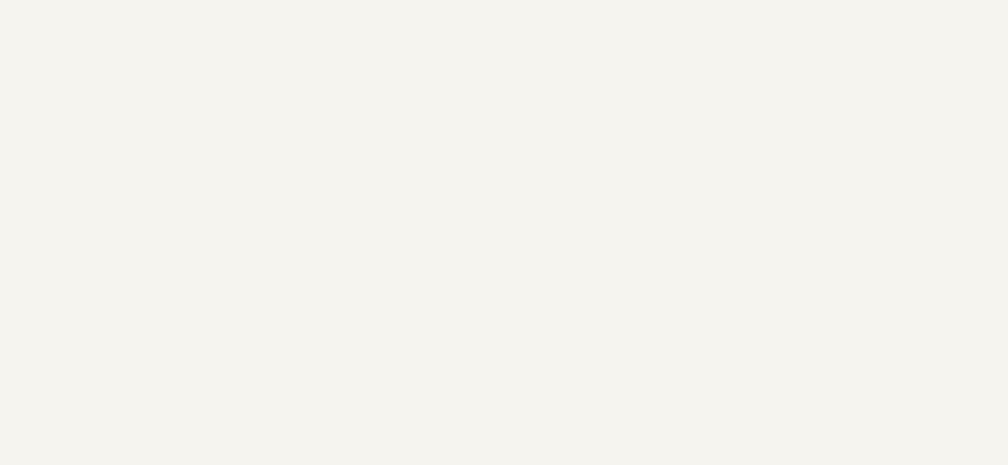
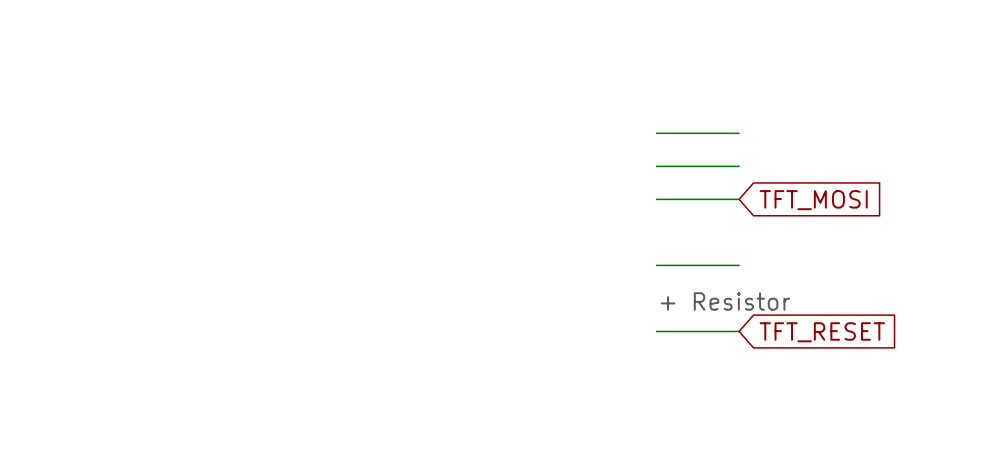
wire: none -> (656, 133) (739, 133)
wire: none -> (656, 166) (739, 166)
wire: none -> (656, 199) (739, 199)
global label: none -> TFT_MOSI (813, 200)
wire: none -> (656, 265) (739, 265)
text: none -> + Resistor (725, 301)
wire: none -> (656, 331) (739, 331)
global label: none -> TFT_RESET (822, 332)

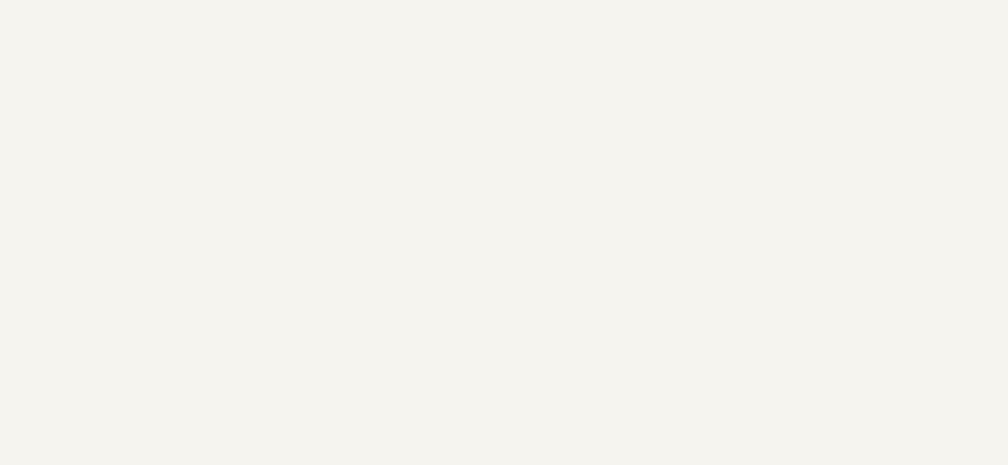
wire: (656, 133) (739, 133) -> none
wire: (656, 166) (739, 166) -> none
wire: (656, 199) (739, 199) -> none
global label: TFT_MOSI (813, 200) -> none
wire: (656, 265) (739, 265) -> none
text: + Resistor (725, 301) -> none
wire: (656, 331) (739, 331) -> none
global label: TFT_RESET (822, 332) -> none

